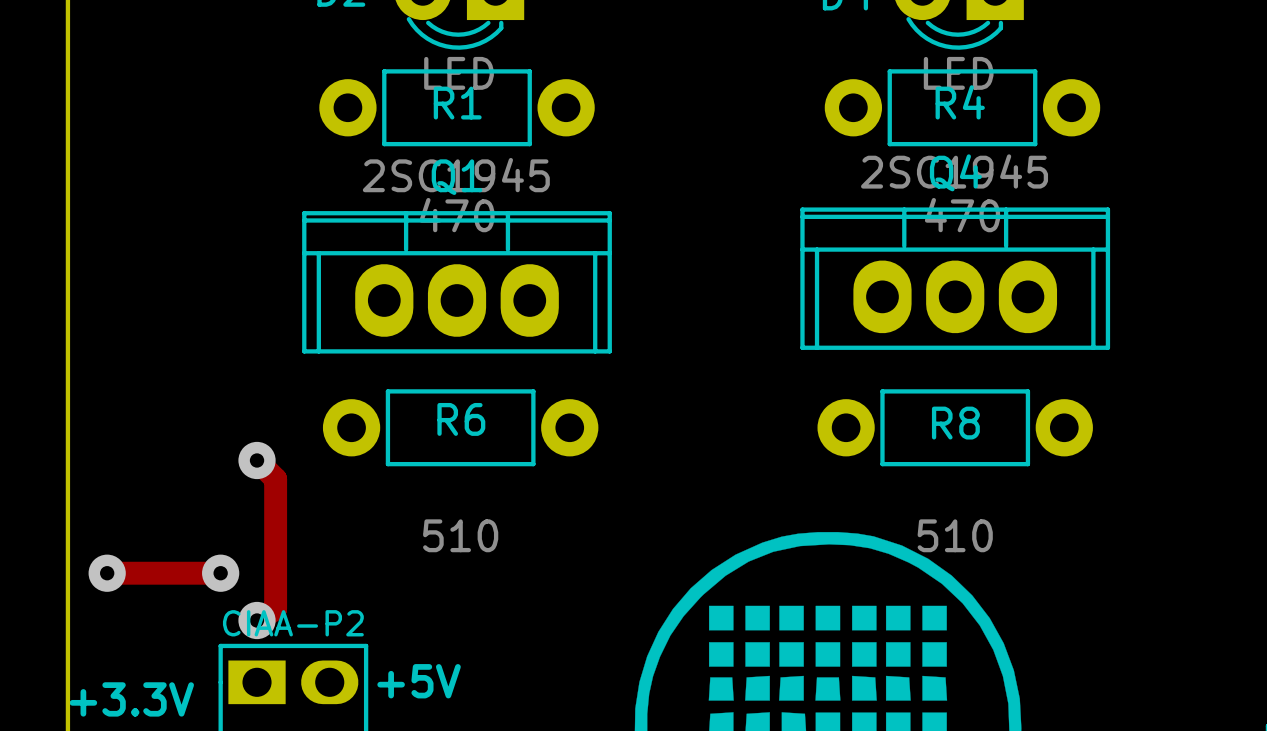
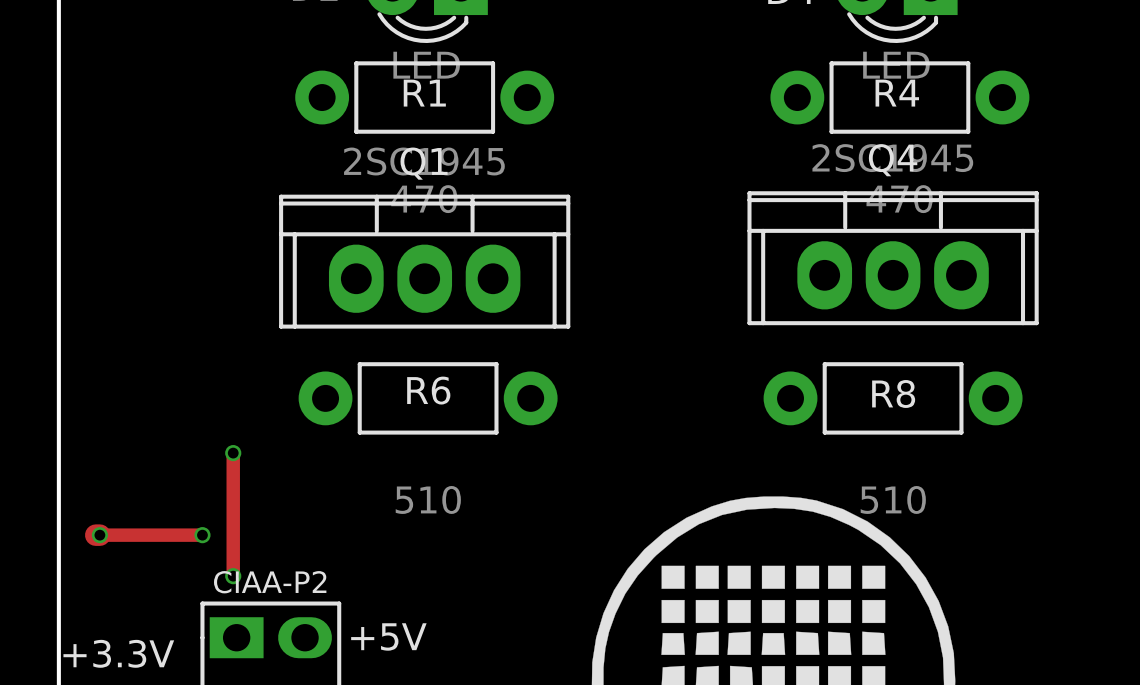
via size: [238, 441, 276, 480] -> [225, 445, 242, 462]
track: (257, 460) (275, 479) (275, 608) (257, 620) -> none
track: none -> (233, 453) (233, 576)
via size: [88, 554, 126, 592] -> [91, 527, 108, 544]
via size: [202, 554, 240, 592] -> [194, 527, 211, 544]
track width: thick (111, 573) (220, 573) -> thin (99, 535) (202, 535)
via size: [238, 601, 276, 640] -> [225, 568, 242, 585]

